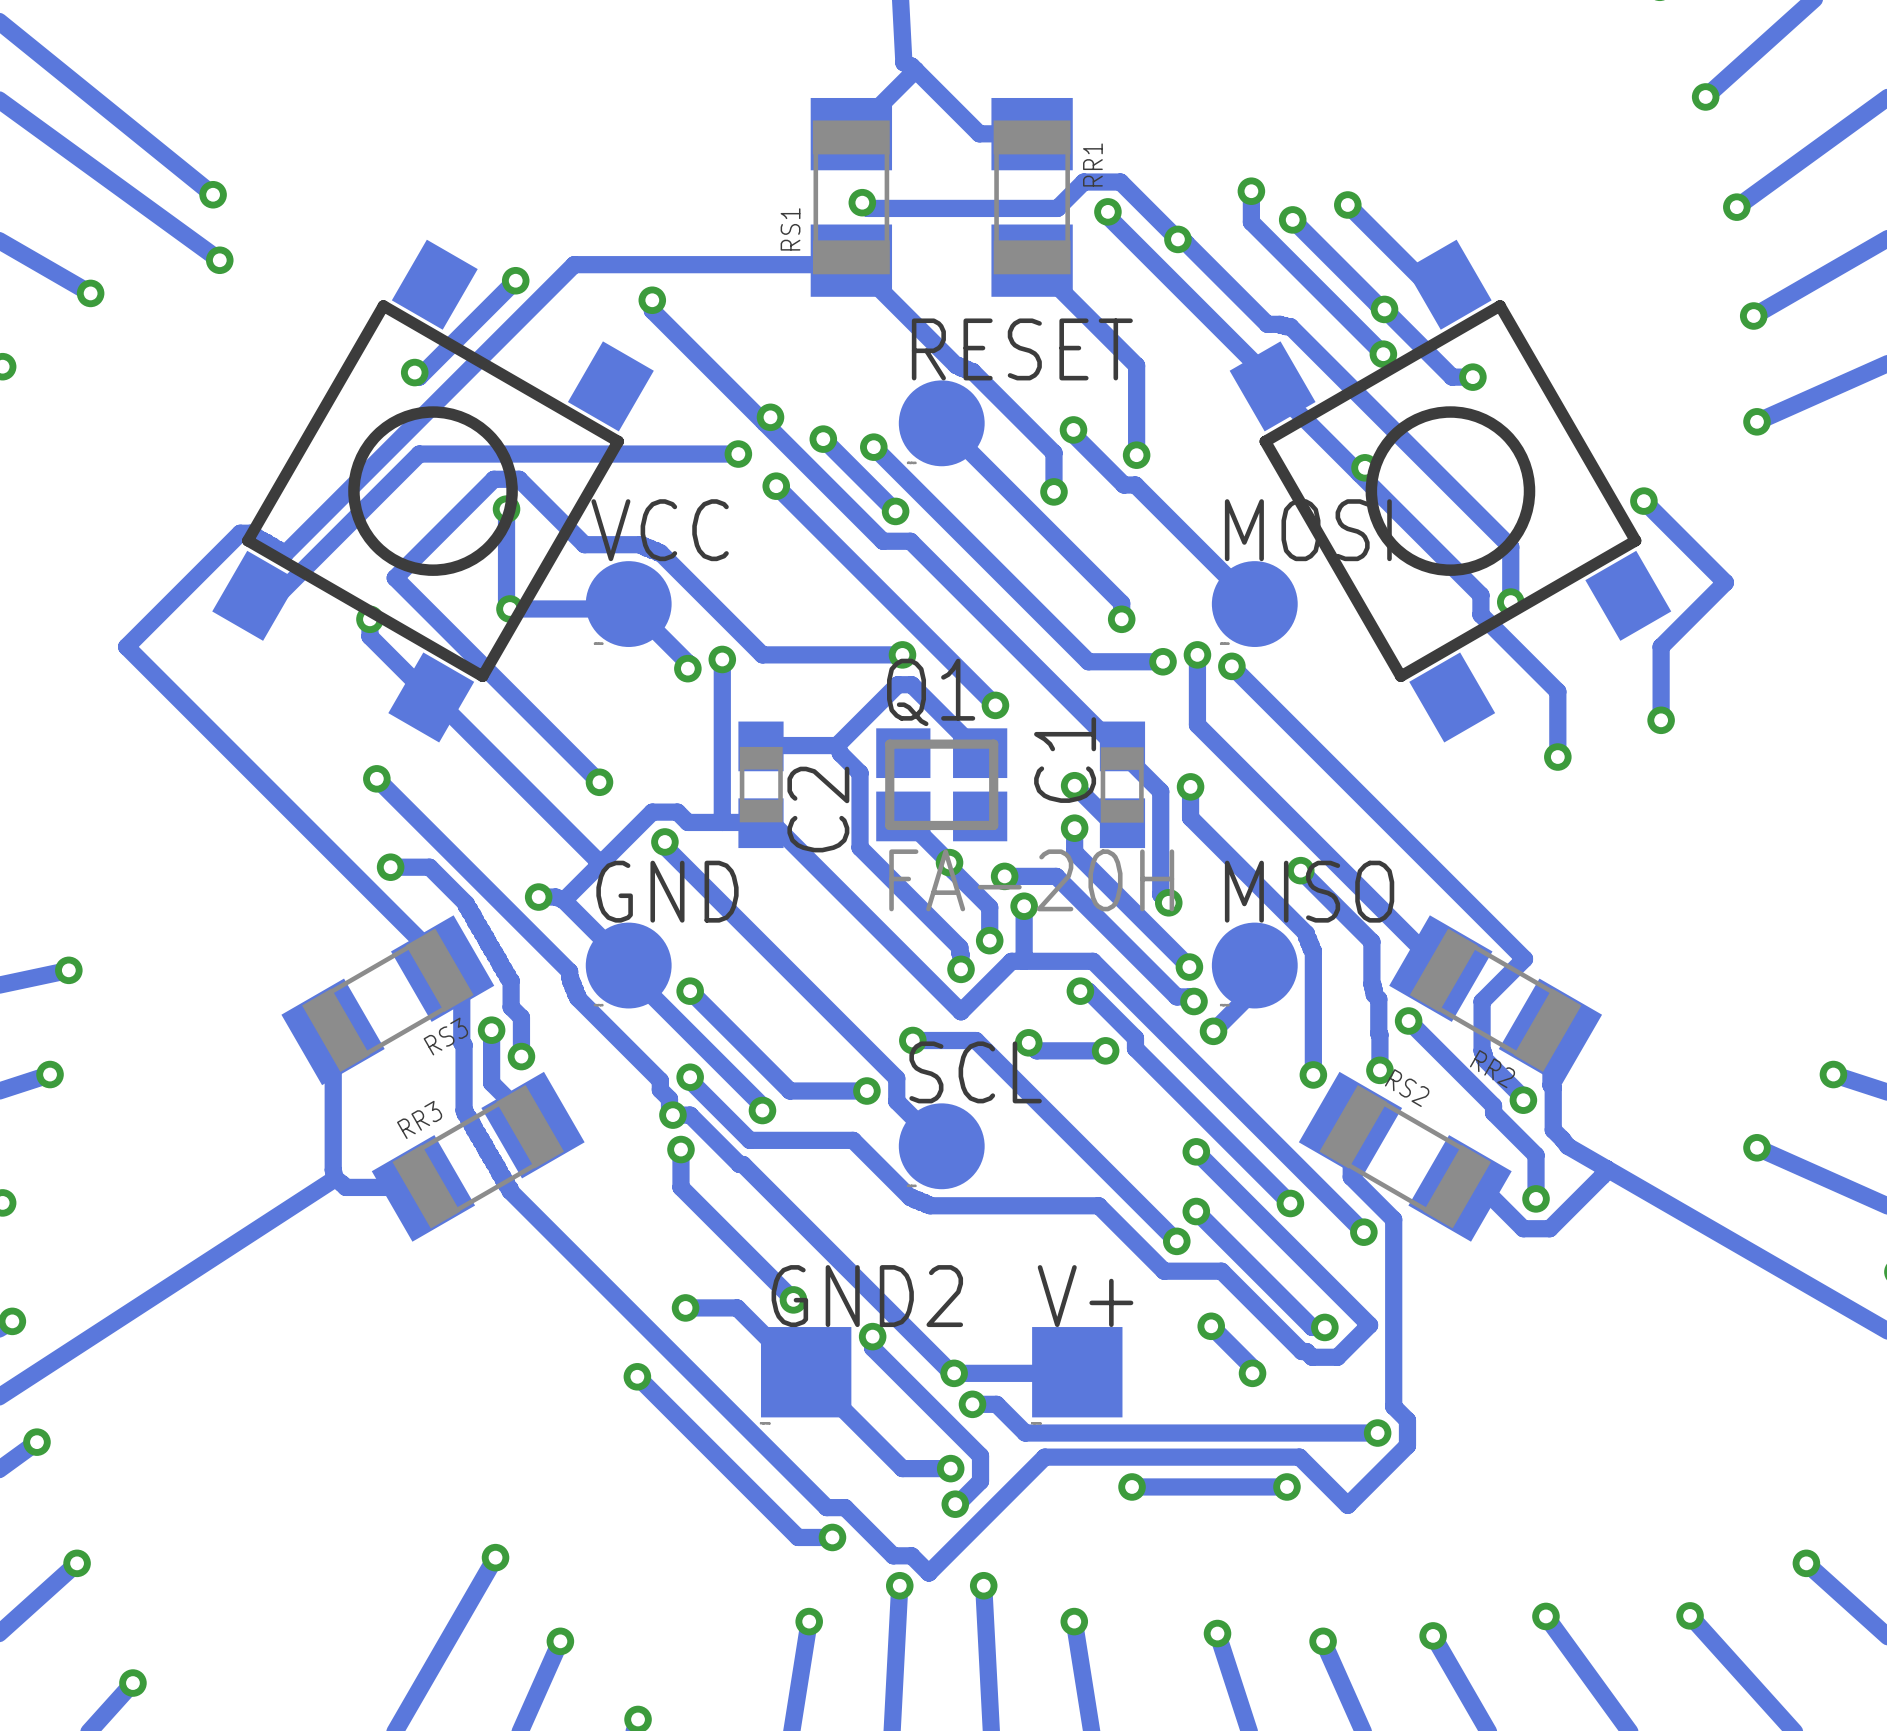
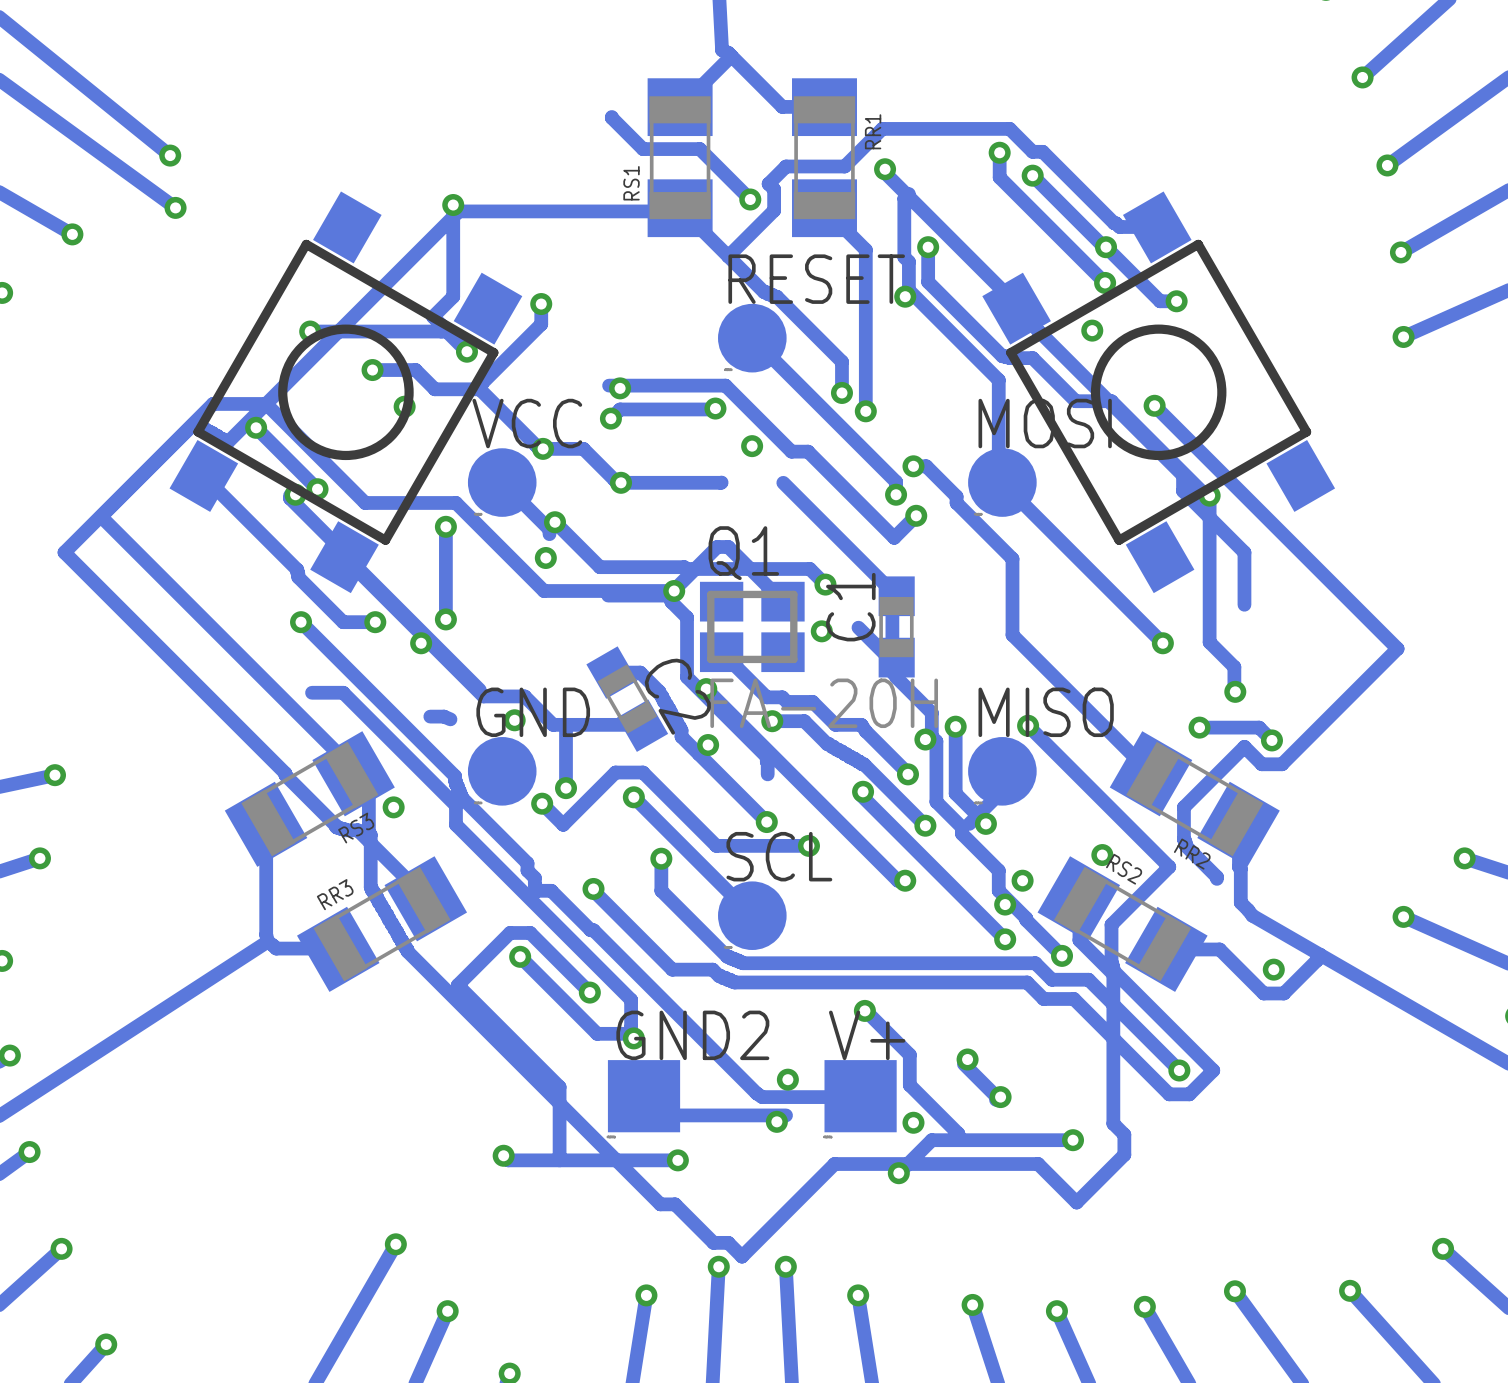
track: none -> (611, 116) (643, 149) (699, 149) (750, 199)
track: (1083, 182) (1120, 182) (1177, 239) (1185, 242) (1267, 324) (1290, 326) (1510, 547) (1510, 602) -> none
track: (862, 202) (868, 208) (983, 208) -> (728, 256) (774, 210) (774, 189) (768, 183) (786, 166)
via position: (862, 202) -> (750, 199)
track: (1347, 204) (1426, 284) -> (865, 145) (882, 128) (1009, 128) (1032, 151) (1042, 151) (1114, 223) (1119, 227) (1139, 227)
via: (1347, 204) -> none
via: (1177, 239) -> none
track: none -> (453, 205) (453, 296) (433, 316) (441, 325) (441, 331)
via: none -> (453, 205)
track: (515, 280) (419, 377) (414, 372) -> none
via: (515, 280) -> none
track: (652, 300) (652, 310) (882, 541) (910, 541) (1113, 744) (1122, 746) -> none
via: (652, 300) -> none
track: none -> (928, 247) (928, 282) (1002, 356) (1032, 358) (1075, 401) (1111, 401) (1203, 492) (1209, 495) (1209, 642) (1234, 667) (1235, 691)
via: none -> (928, 247)
track: (1083, 312) (1136, 365) (1136, 455) -> (865, 249) (865, 411)
via: none -> (905, 296)
via position: (414, 372) -> (310, 331)
track: none -> (541, 304) (541, 324) (482, 382) (479, 389)
via: none -> (541, 304)
via: none -> (1092, 330)
track: none -> (310, 331) (446, 331) (466, 351)
via: (770, 417) -> none
track: (1073, 429) (1073, 434) (1123, 485) (1135, 485) (1254, 604) -> (908, 194) (904, 198) (904, 257) (908, 261) (908, 290) (998, 380) (998, 476) (1002, 482)
via: (1073, 429) -> none
track: (823, 439) (895, 511) -> (610, 418) (620, 409) (715, 409)
via: (823, 439) -> none
via: none -> (466, 351)
track: (873, 447) (1088, 661) (1163, 661) -> none
via: (873, 447) -> none
track: (738, 454) (419, 454) (266, 606) (255, 595) -> (375, 622) (343, 622) (298, 577) (297, 569) (203, 476)
via: (738, 454) -> none
via: (1136, 455) -> none
track: none -> (372, 370) (415, 370) (434, 389) (479, 389)
via: none -> (372, 370)
via: (1365, 467) -> none
track: none -> (609, 385) (725, 385) (791, 451) (808, 451) (894, 537) (916, 515)
track: (776, 486) (995, 705) -> none
track: none -> (479, 389) (536, 446) (543, 448) (583, 448) (614, 480) (621, 482) (720, 482)
track: (1643, 501) (1725, 582) (1661, 646) (1661, 720) -> none
via: (1643, 501) -> none
via: none -> (1154, 405)
track: (506, 509) (506, 600) (509, 608) (621, 608) (628, 604) -> none
via: none -> (865, 411)
via: none -> (610, 418)
track: none -> (256, 427) (317, 489)
via: none -> (256, 427)
via: none -> (752, 446)
via: none -> (543, 448)
via: none -> (913, 466)
via position: (1510, 602) -> (1209, 495)
via: none -> (621, 482)
track: none -> (783, 482) (892, 591) (892, 671) (931, 712) (931, 736)
track: none -> (1002, 482) (1162, 643)
via: (509, 608) -> none
via: none -> (317, 489)
track: (369, 619) (369, 636) (430, 697) -> none
track: none -> (290, 495) (290, 498) (342, 550) (345, 557) (483, 696) (524, 696) (553, 724) (642, 725)
track: none -> (555, 522) (599, 567) (809, 568) (825, 584)
via: none -> (555, 522)
track: (902, 654) (762, 654) (660, 552) (640, 544) (584, 544) (519, 479) (493, 479) (395, 577) (599, 782) -> none
via: (902, 654) -> none
track: (1197, 654) (1197, 724) (1267, 794) -> (913, 466) (926, 466) (956, 496) (956, 502) (1012, 558) (1012, 635)
via: (1197, 654) -> none
track: none -> (445, 526) (445, 619)
via: none -> (445, 526)
track: (722, 659) (722, 822) -> none
via: (722, 659) -> none
via position: (1163, 661) -> (916, 515)
track: (1231, 666) (1524, 959) (1482, 1001) (1482, 1010) -> (1154, 405) (1397, 648) (1282, 764) (1261, 764) (1244, 746) (1183, 807)
via: (1231, 666) -> none
via: (687, 668) -> none
via: none -> (545, 557)
via: (995, 705) -> none
via: (1661, 720) -> none
via: none -> (825, 584)
via: none -> (674, 591)
track: (1122, 746) (1122, 753) (1160, 791) (1160, 894) (1168, 902) -> none
via: (1557, 757) -> none
via: none -> (445, 619)
via: none -> (375, 622)
via: (599, 782) -> none
C2 rotation: 0° (760, 784) -> 30° counterclockwise (627, 699)
C2 position: (760, 784) -> (627, 699)
via: (1074, 785) -> none
track: (1190, 786) (1190, 817) (1306, 933) (1313, 950) (1313, 1074) -> none
via: (1190, 786) -> none
via: none -> (821, 631)
via: none -> (421, 643)
via: none -> (1162, 643)
track: (1074, 828) (1074, 852) (1189, 967) -> none
via: (1074, 828) -> none
track: (664, 841) (664, 846) (896, 1078) (896, 1101) -> (633, 797) (716, 879)
via: (664, 841) -> none
track: none -> (611, 672) (640, 672) (659, 691) (681, 730) (681, 736) (766, 822)
track: none -> (706, 689) (897, 880) (905, 880)
via: none -> (706, 689)
track: (949, 862) (952, 870) (989, 907) (989, 940) -> (758, 689) (766, 697) (782, 697) (786, 701) (812, 701) (835, 724) (861, 724) (907, 774)
via: (949, 862) -> none
via: none -> (1235, 691)
via: (390, 867) -> none
track: (1300, 870) (1371, 941) (1371, 984) (1374, 994) (1378, 999) (1379, 1070) -> none
via position: (1300, 870) -> (1028, 725)
track: (1004, 876) (1056, 876) (1176, 996) (1189, 996) (1194, 1001) -> none
via: (1004, 876) -> none
via: (538, 897) -> none
via: none -> (514, 720)
track: none -> (772, 721) (804, 721) (827, 744) (863, 764) (925, 825)
via: none -> (772, 721)
via: (1168, 902) -> none
track: (466, 903) (511, 980) (511, 1007) (521, 1017) (521, 1056) -> (372, 722) (455, 805) (455, 824) (631, 999) (629, 1033) (597, 1033) (520, 956)
track: (1024, 906) (1024, 961) -> none
via: (1024, 906) -> none
track: none -> (566, 724) (566, 788)
track: none -> (1028, 725) (1169, 866) (1111, 924) (1111, 963) (1113, 970) (1213, 1070) (1189, 1094) (1169, 1094) (1073, 998) (1043, 998) (1027, 982) (734, 982) (719, 976) (712, 969) (672, 969) (593, 888)
track: none -> (955, 726) (955, 793) (985, 823)
via: none -> (955, 726)
track: none -> (1199, 727) (1259, 727) (1271, 740)
via: none -> (1199, 727)
track: none -> (931, 736) (936, 741) (936, 801) (962, 827) (962, 833) (998, 870) (998, 890) (1062, 955)
via: none -> (925, 739)
via: none -> (1271, 740)
via: none -> (708, 745)
via: (989, 940) -> none
via: (1189, 967) -> none
via: (961, 969) -> none
via: none -> (907, 774)
via: none -> (566, 788)
track: (690, 991) (790, 1091) (866, 1091) -> none
via: (690, 991) -> none
track: (1080, 991) (1088, 991) (1135, 1038) (1135, 1048) (1290, 1203) -> none
track: none -> (860, 794) (1005, 939)
via: none -> (633, 797)
via: (1194, 1001) -> none
track: none -> (542, 803) (563, 824) (615, 772) (643, 772) (716, 845) (808, 845)
via: none -> (542, 803)
track: (1408, 1021) (1493, 1105) (1493, 1112) (1536, 1155) (1536, 1198) -> none
via: (1408, 1021) -> none
via: none -> (766, 822)
track: (491, 1030) (491, 1082) -> (674, 591) (544, 591) (455, 502) (365, 502) (266, 403) (213, 403) (64, 552) (285, 773) (336, 827) (345, 830) (357, 830) (392, 865)
via position: (491, 1030) -> (393, 807)
via position: (1213, 1031) -> (985, 823)
via: none -> (925, 825)
track: (912, 1040) (975, 1040) (1176, 1241) -> none
via: (912, 1040) -> none
track: (1028, 1042) (1036, 1050) (1105, 1050) -> none
via position: (1028, 1042) -> (808, 845)
via: (1105, 1050) -> none
via: (521, 1056) -> none
via: none -> (661, 858)
via: (1313, 1074) -> none
track: (690, 1077) (690, 1080) (749, 1140) (853, 1140) -> (661, 858) (661, 890) (681, 910)
via: (690, 1077) -> none
via: (866, 1091) -> none
via: (1523, 1100) -> none
via: none -> (905, 880)
via: none -> (1022, 880)
track: (762, 1110) (762, 1105) (630, 973) (628, 964) (563, 900) (652, 812) (677, 812) (687, 822) (760, 823) (769, 820) (961, 1011) (1011, 961) (1093, 961) (1363, 1232) -> none
via position: (762, 1110) -> (593, 888)
via: (672, 1115) -> none
via: none -> (1005, 904)
track: (680, 1149) (680, 1187) (787, 1294) -> none
via: (680, 1149) -> none
track: (1196, 1151) (1369, 1325) (1337, 1357) (1312, 1357) (1306, 1351) (1301, 1351) (1221, 1271) (1164, 1271) (1098, 1205) -> (1179, 1070) (1088, 979) (1051, 979) (1035, 963) (877, 963)
via: (1196, 1151) -> none
track: (1606, 1168) (1602, 1175) (1549, 1228) (1523, 1228) (1483, 1188) -> (1320, 954) (1283, 993) (1263, 993) (1219, 949) (1184, 949)
via: none -> (1005, 939)
via: none -> (1062, 955)
via: none -> (520, 956)
via position: (1536, 1198) -> (1273, 969)
via: (1290, 1203) -> none
track: (1196, 1211) (1312, 1327) (1324, 1327) -> none
via: (1196, 1211) -> none
via: (1363, 1232) -> none
via: (1176, 1241) -> none
track: none -> (589, 992) (530, 932) (510, 932) (457, 985) (559, 1087) (559, 1160)
via: none -> (589, 992)
track: none -> (864, 1010) (909, 1054) (909, 1085) (958, 1133) (958, 1140)
via: none -> (864, 1010)
track: (685, 1307) (737, 1307) (798, 1368) (806, 1372) -> none
via: (685, 1307) -> none
track: (1211, 1326) (1252, 1367) (1252, 1373) -> none
via: (1324, 1327) -> none
track: none -> (963, 1064) (996, 1096) (996, 1099)
track: (872, 1336) (872, 1348) (980, 1455) (980, 1481) (956, 1505) (955, 1504) -> none
via: (872, 1336) -> none
via: none -> (1179, 1070)
via position: (954, 1373) -> (787, 1079)
track: (637, 1376) (798, 1537) (832, 1537) -> none
via position: (637, 1376) -> (503, 1155)
track: (830, 1396) (902, 1468) (950, 1468) -> (663, 1115) (786, 1115)
track: (972, 1404) (996, 1404) (1025, 1433) (1377, 1433) -> none
via: none -> (913, 1122)
track: none -> (1073, 1140) (931, 1140) (898, 1173)
via position: (1377, 1433) -> (1073, 1140)
track: none -> (503, 1155) (508, 1160) (677, 1160)
via: none -> (677, 1160)
via: (950, 1468) -> none
via position: (1132, 1486) -> (898, 1173)
track: (1286, 1486) (1132, 1486) -> none
via: (1286, 1486) -> none
via: (955, 1504) -> none
via: (832, 1537) -> none

